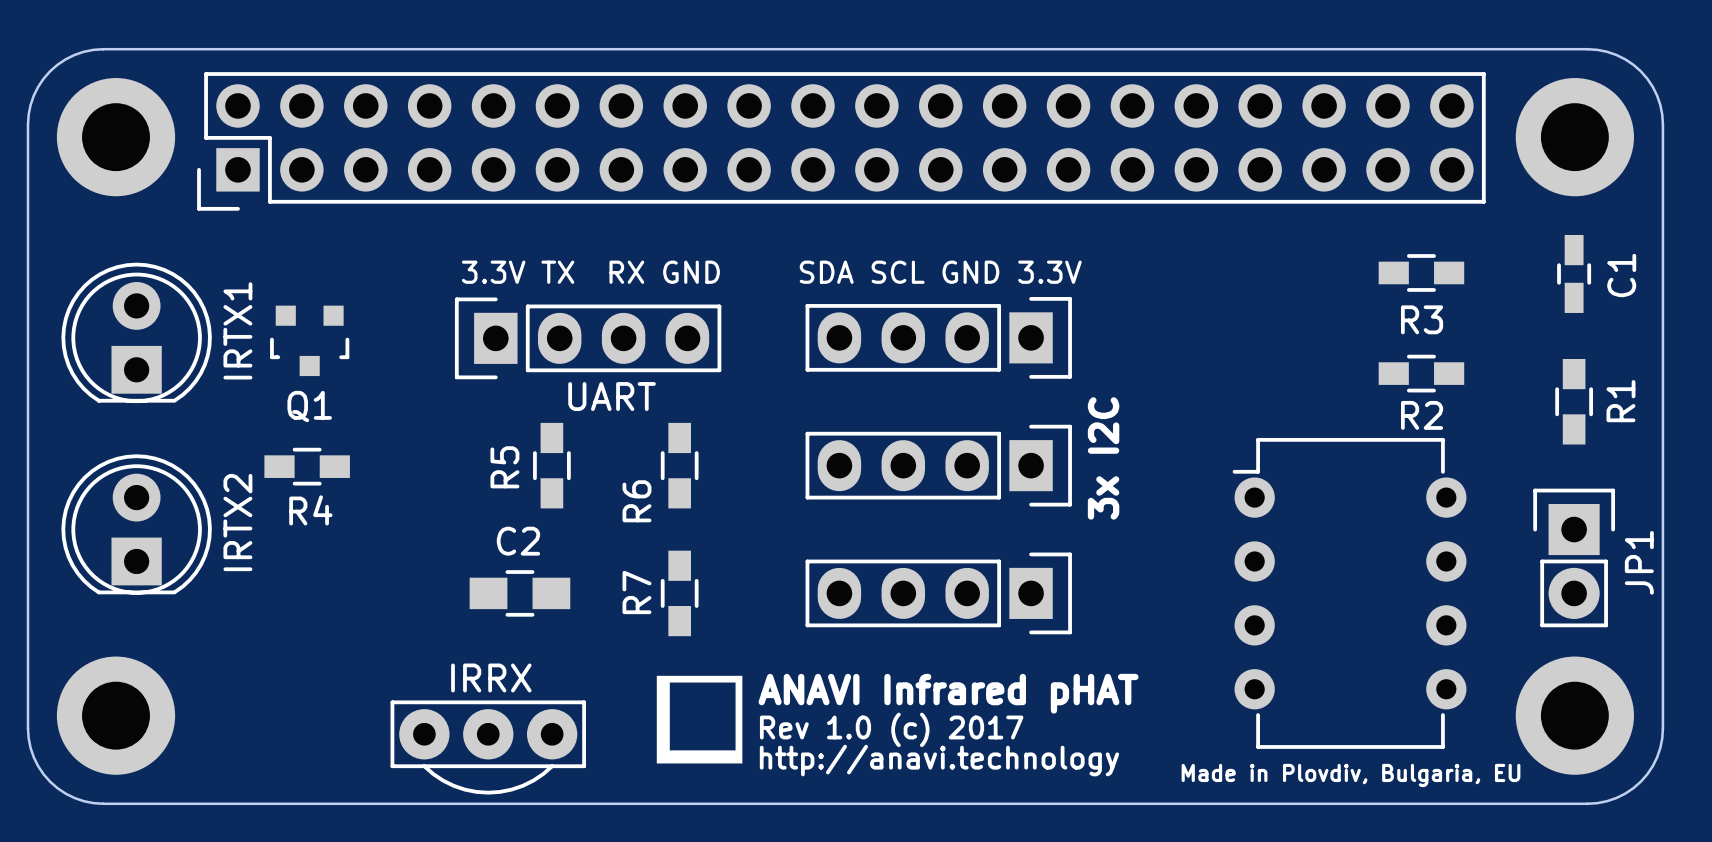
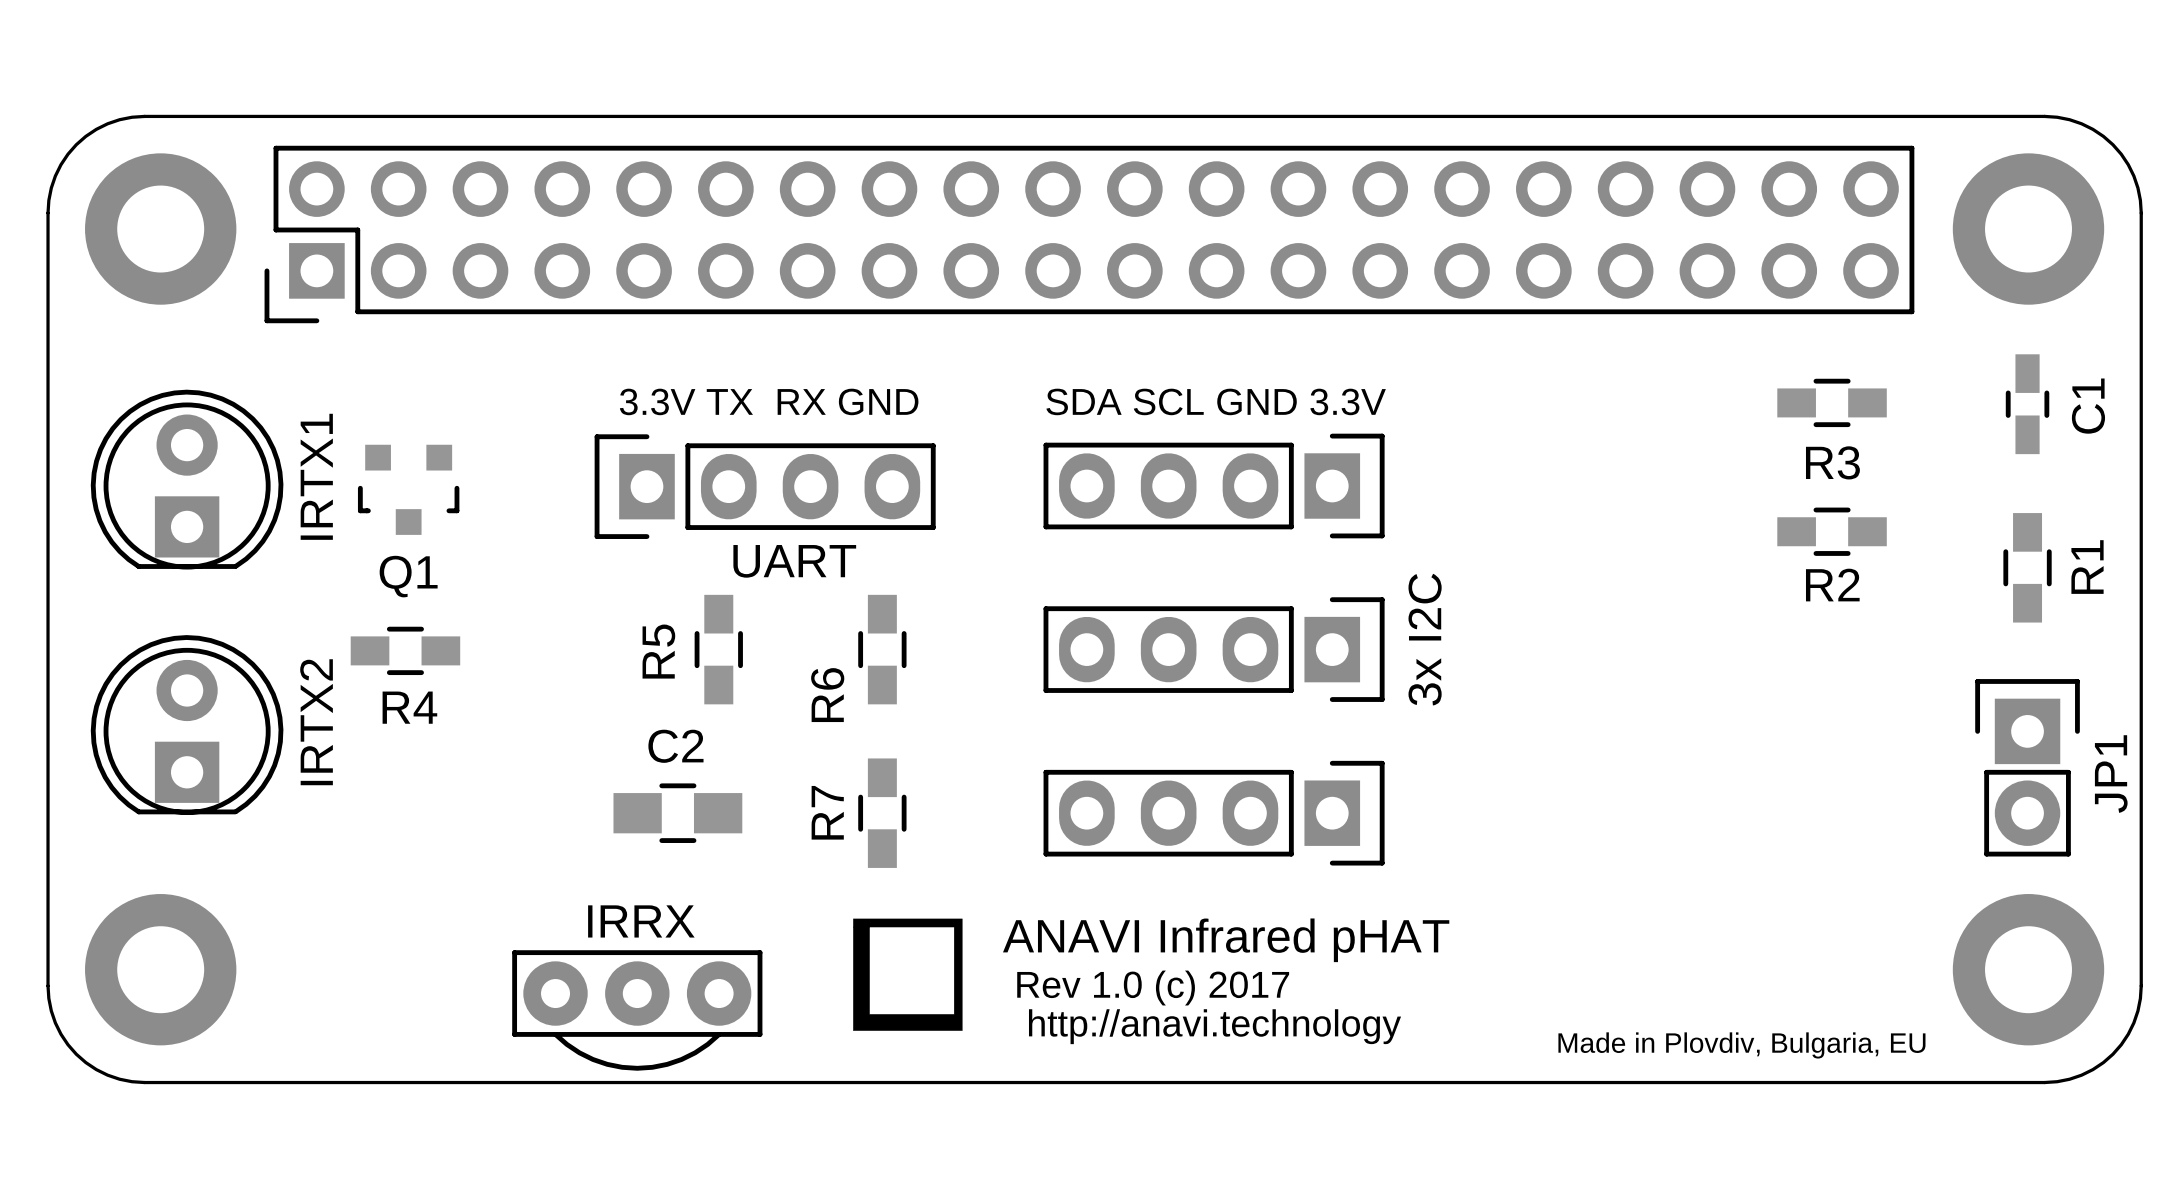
part: (1349, 593) -> none

